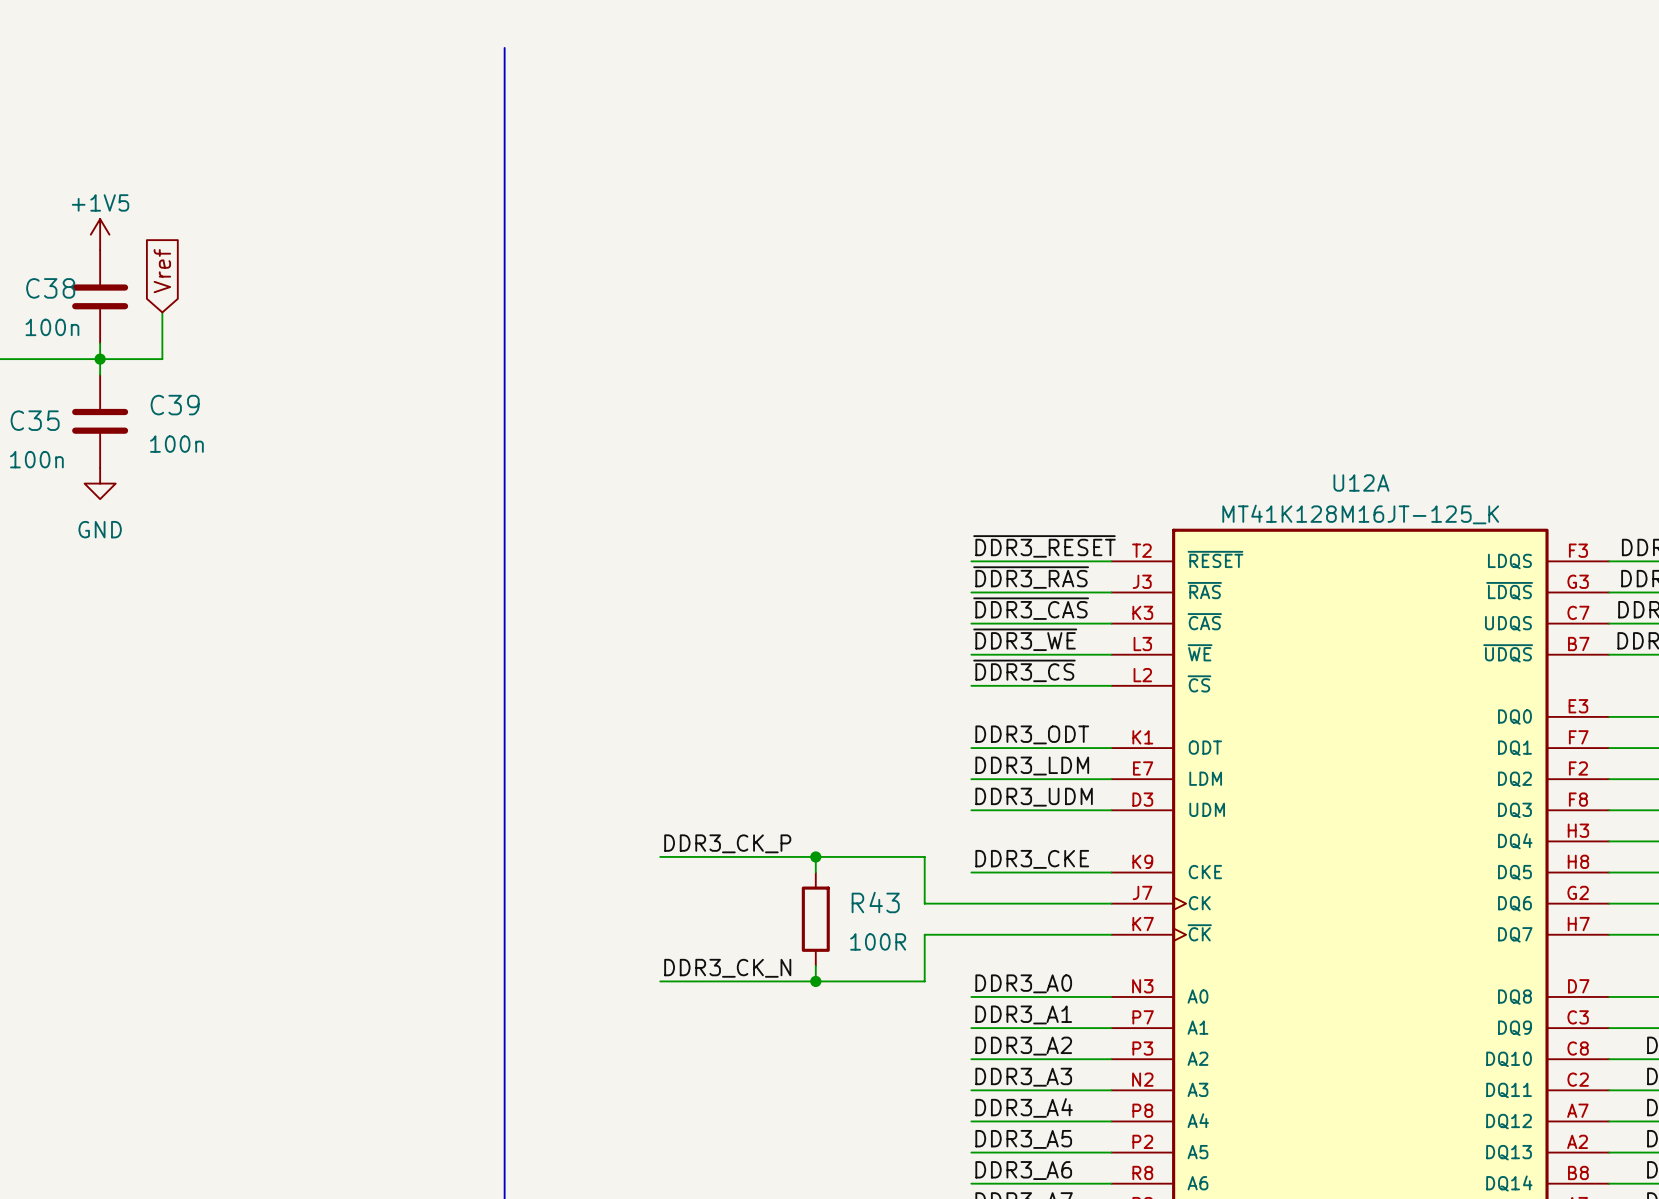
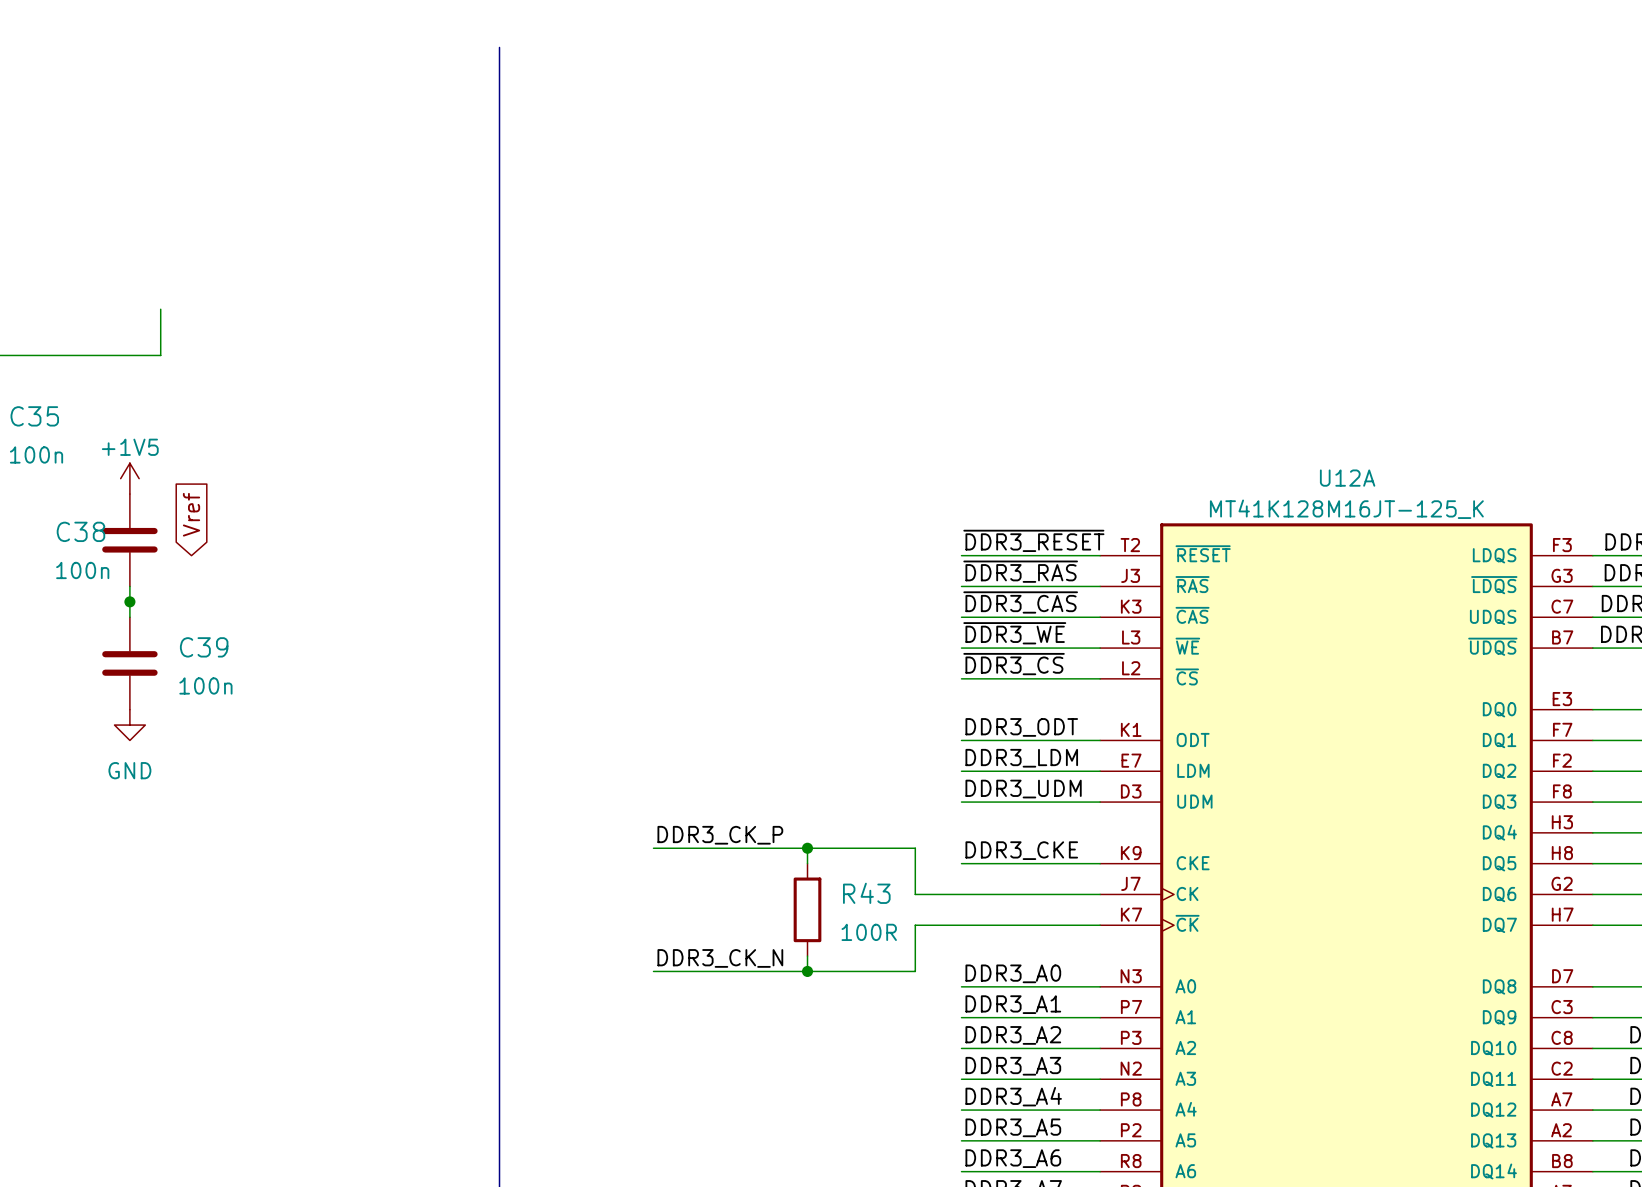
power symbol: +1V5 (100, 234) -> none
global label position: Vref (162, 271) -> Vref (191, 514)
C38 position: (100, 296) -> (129, 540)
wire: (100, 343) (100, 374) -> (129, 586) (129, 617)
junction: (100, 359) -> none
C39 position: (100, 421) -> (129, 663)
power symbol: GND (100, 483) -> none
power symbol: none -> +1V5 (129, 478)
junction: none -> (129, 601)
power symbol: none -> GND (129, 725)

